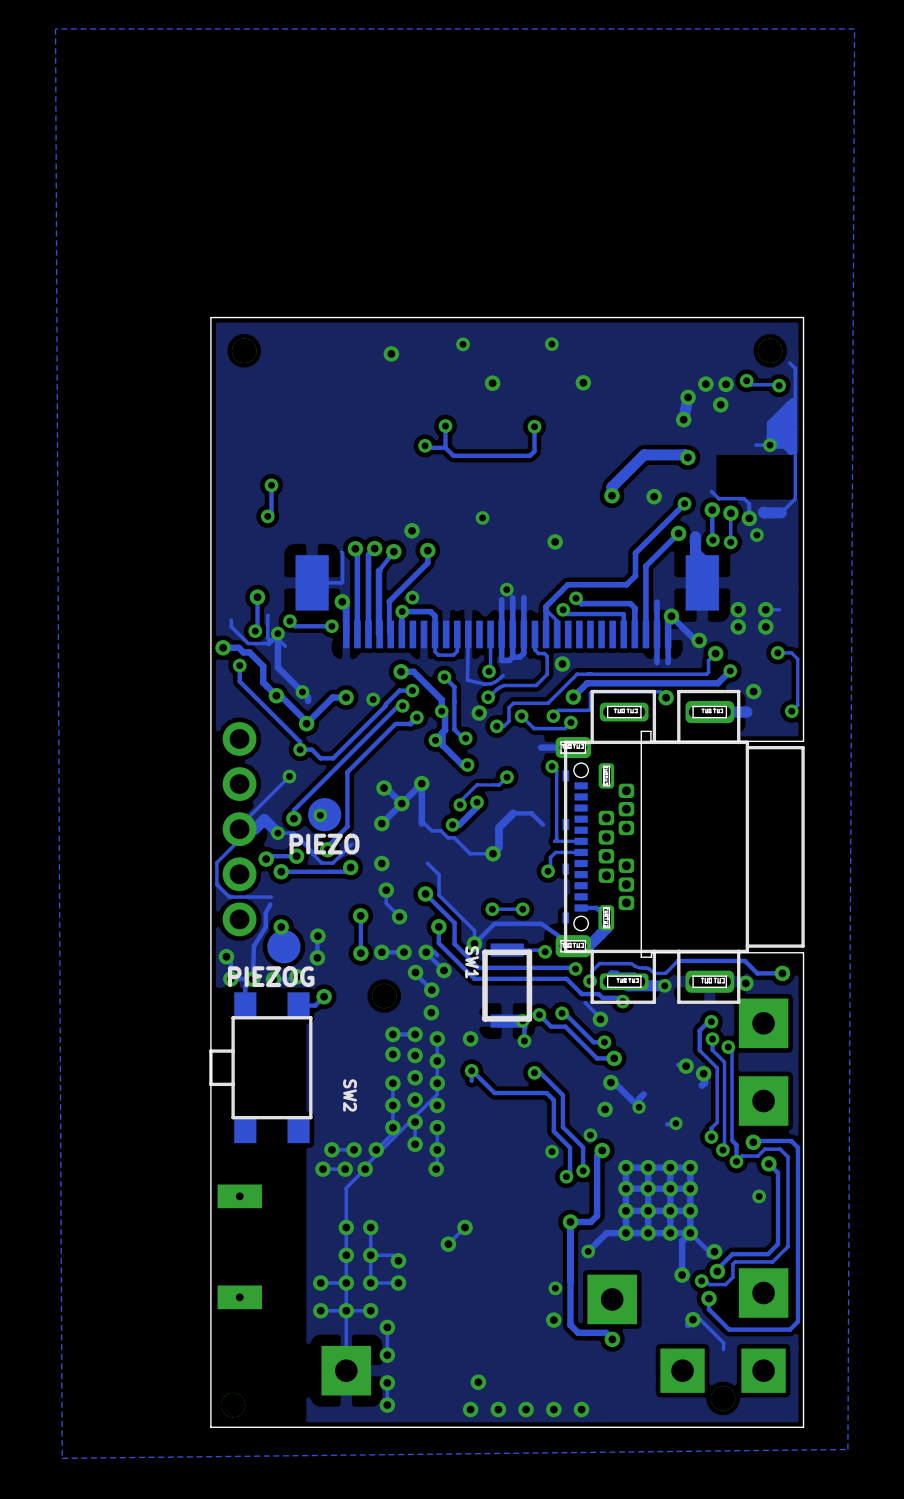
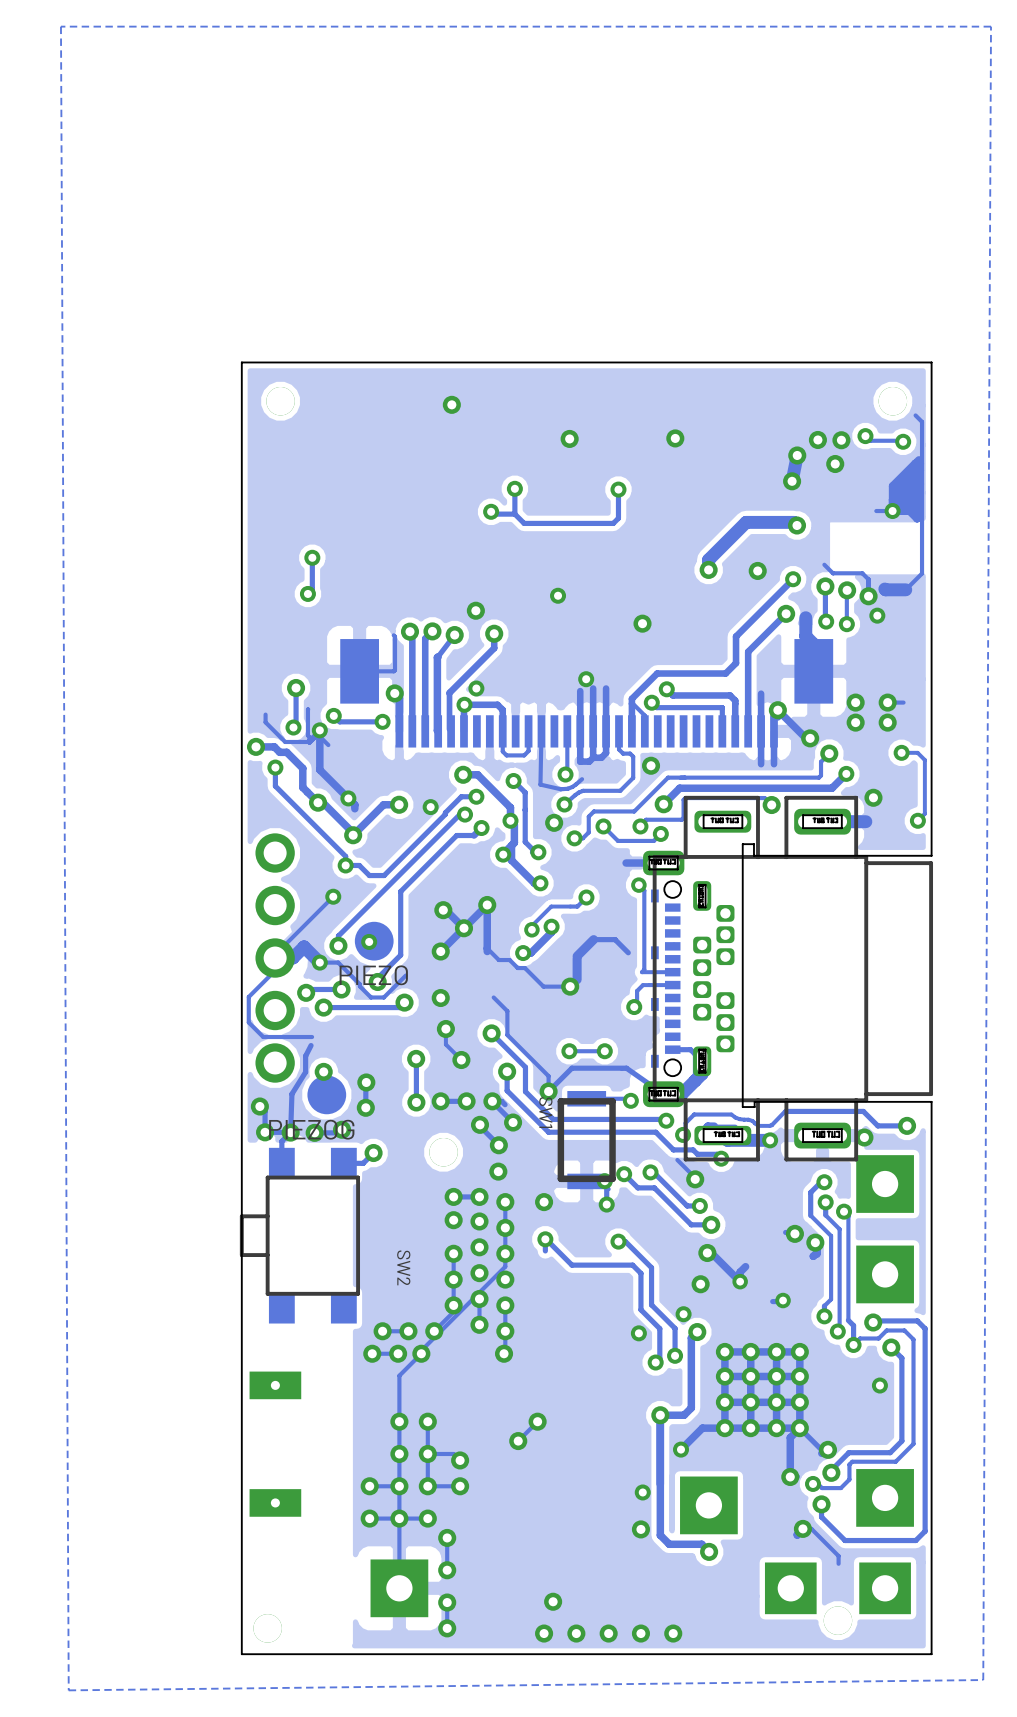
via: (463, 344) -> none
via: (551, 344) -> none

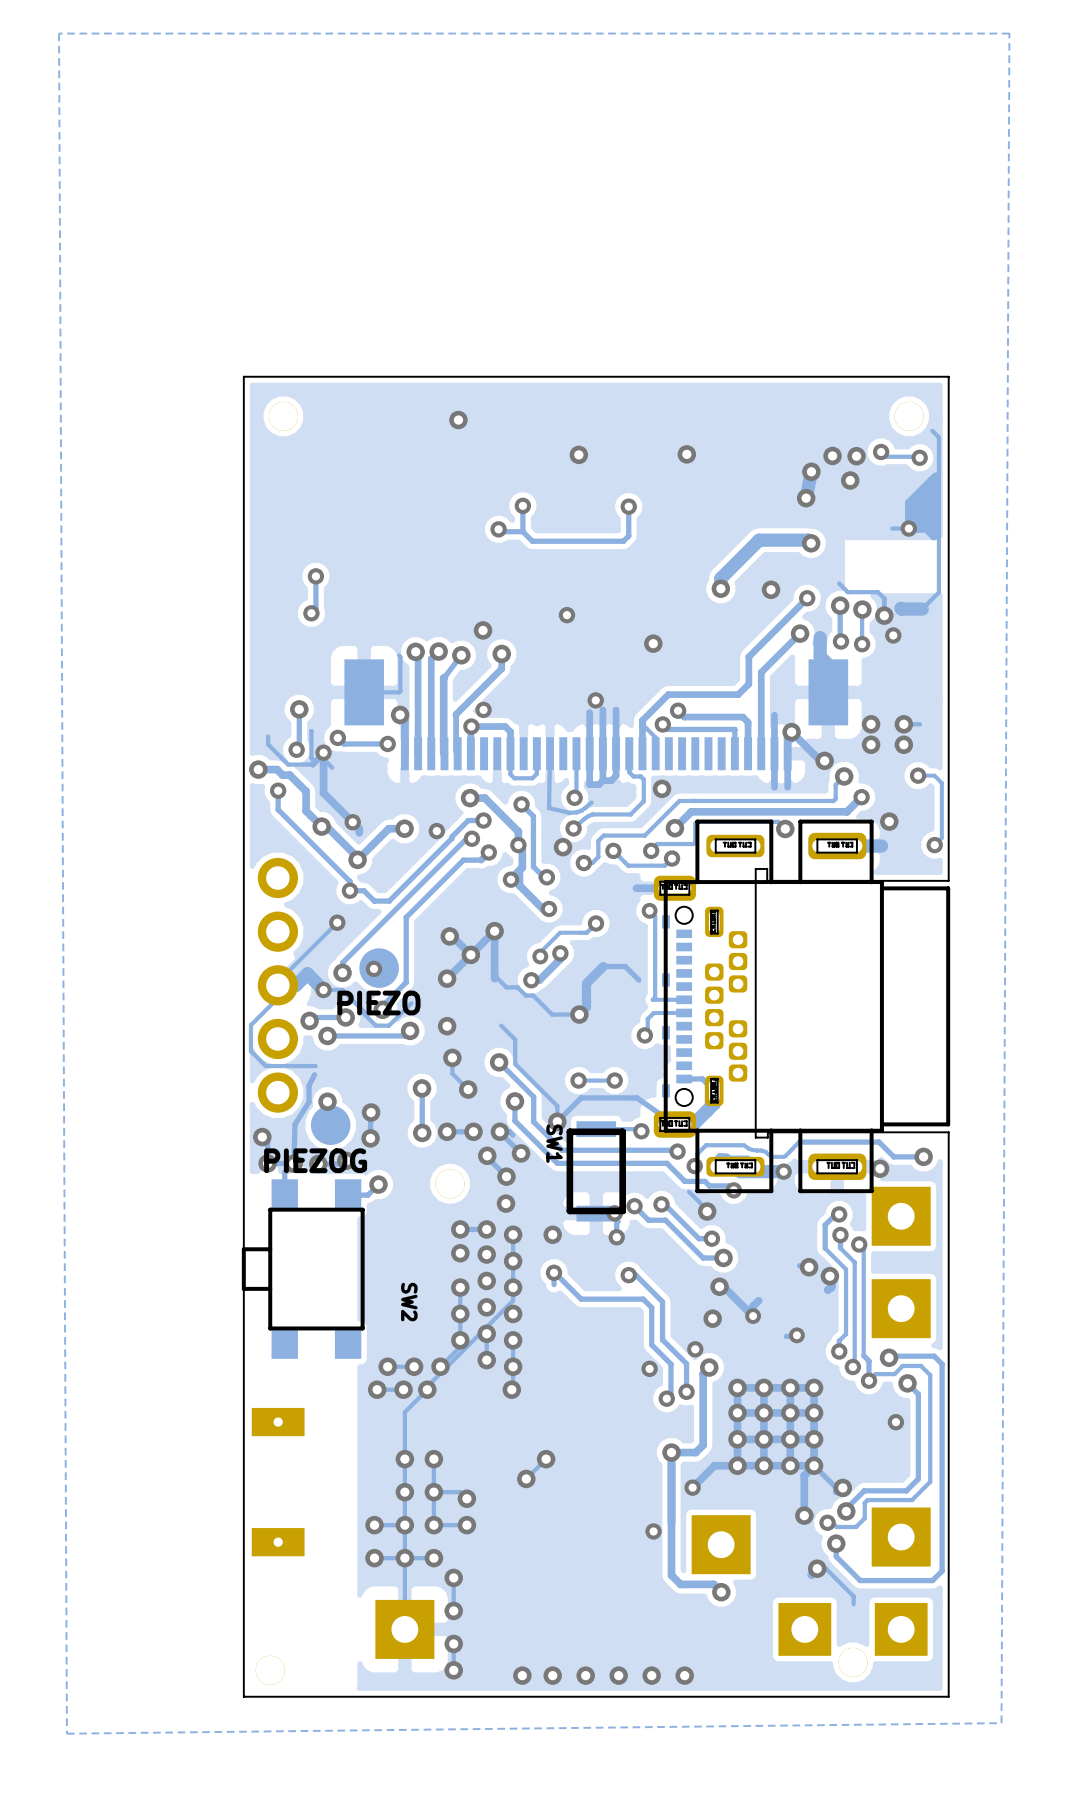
via: (640, 1529) -> none
via position: (553, 1601) -> (522, 1675)

